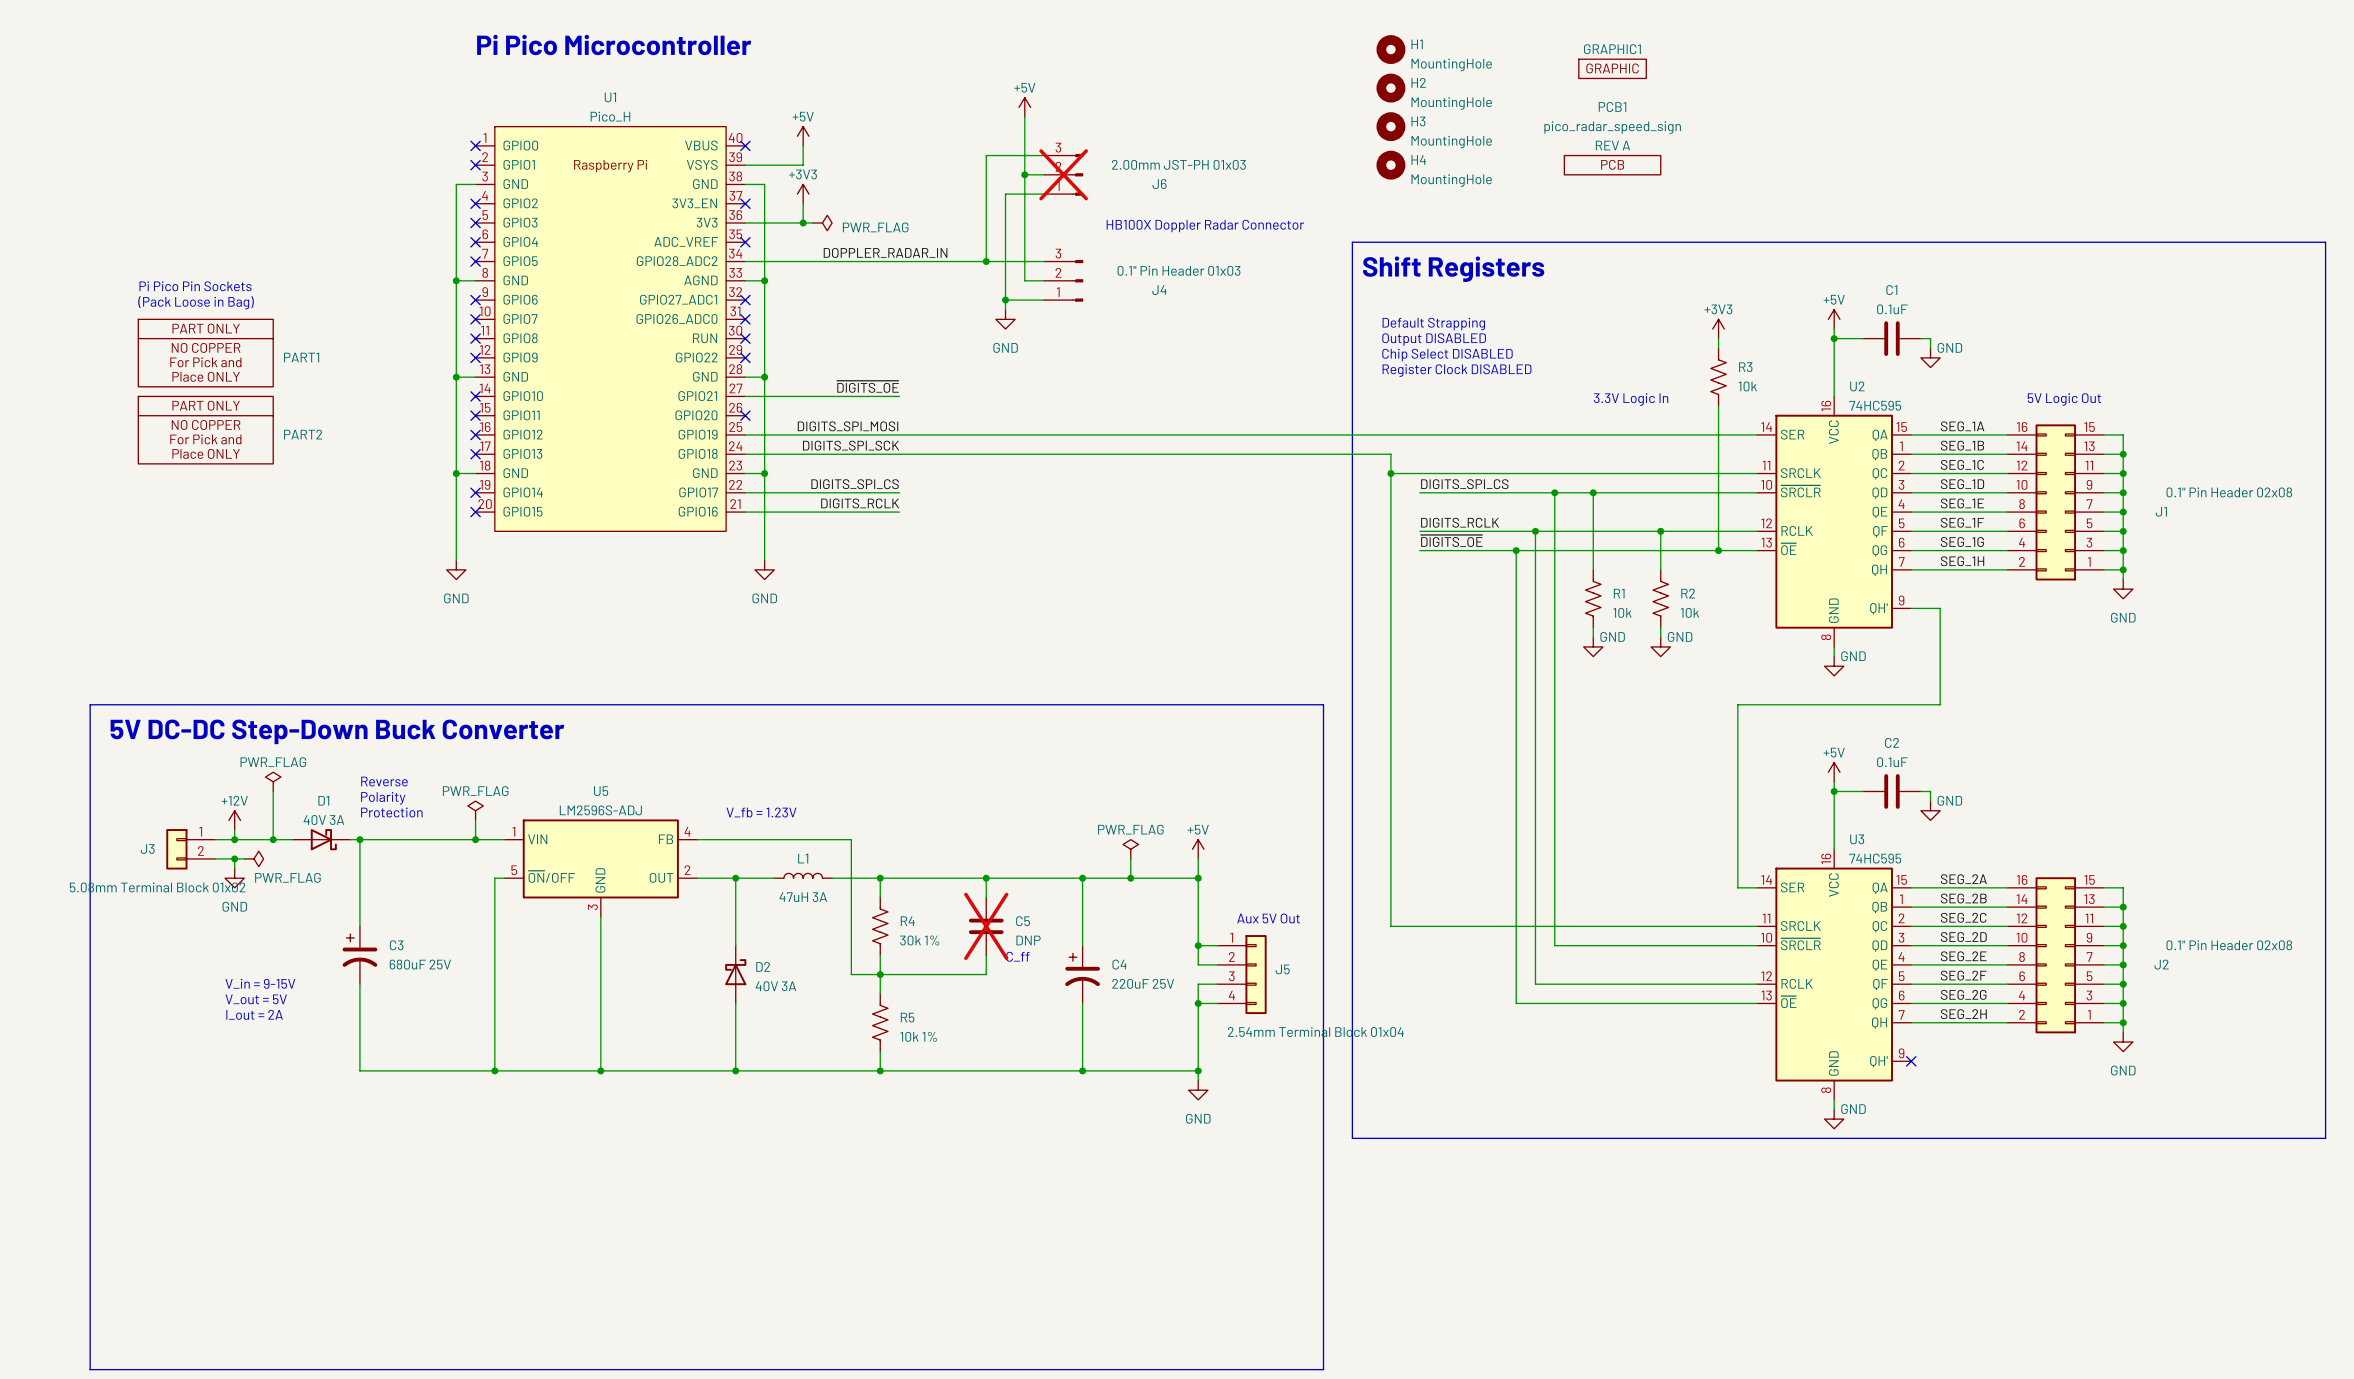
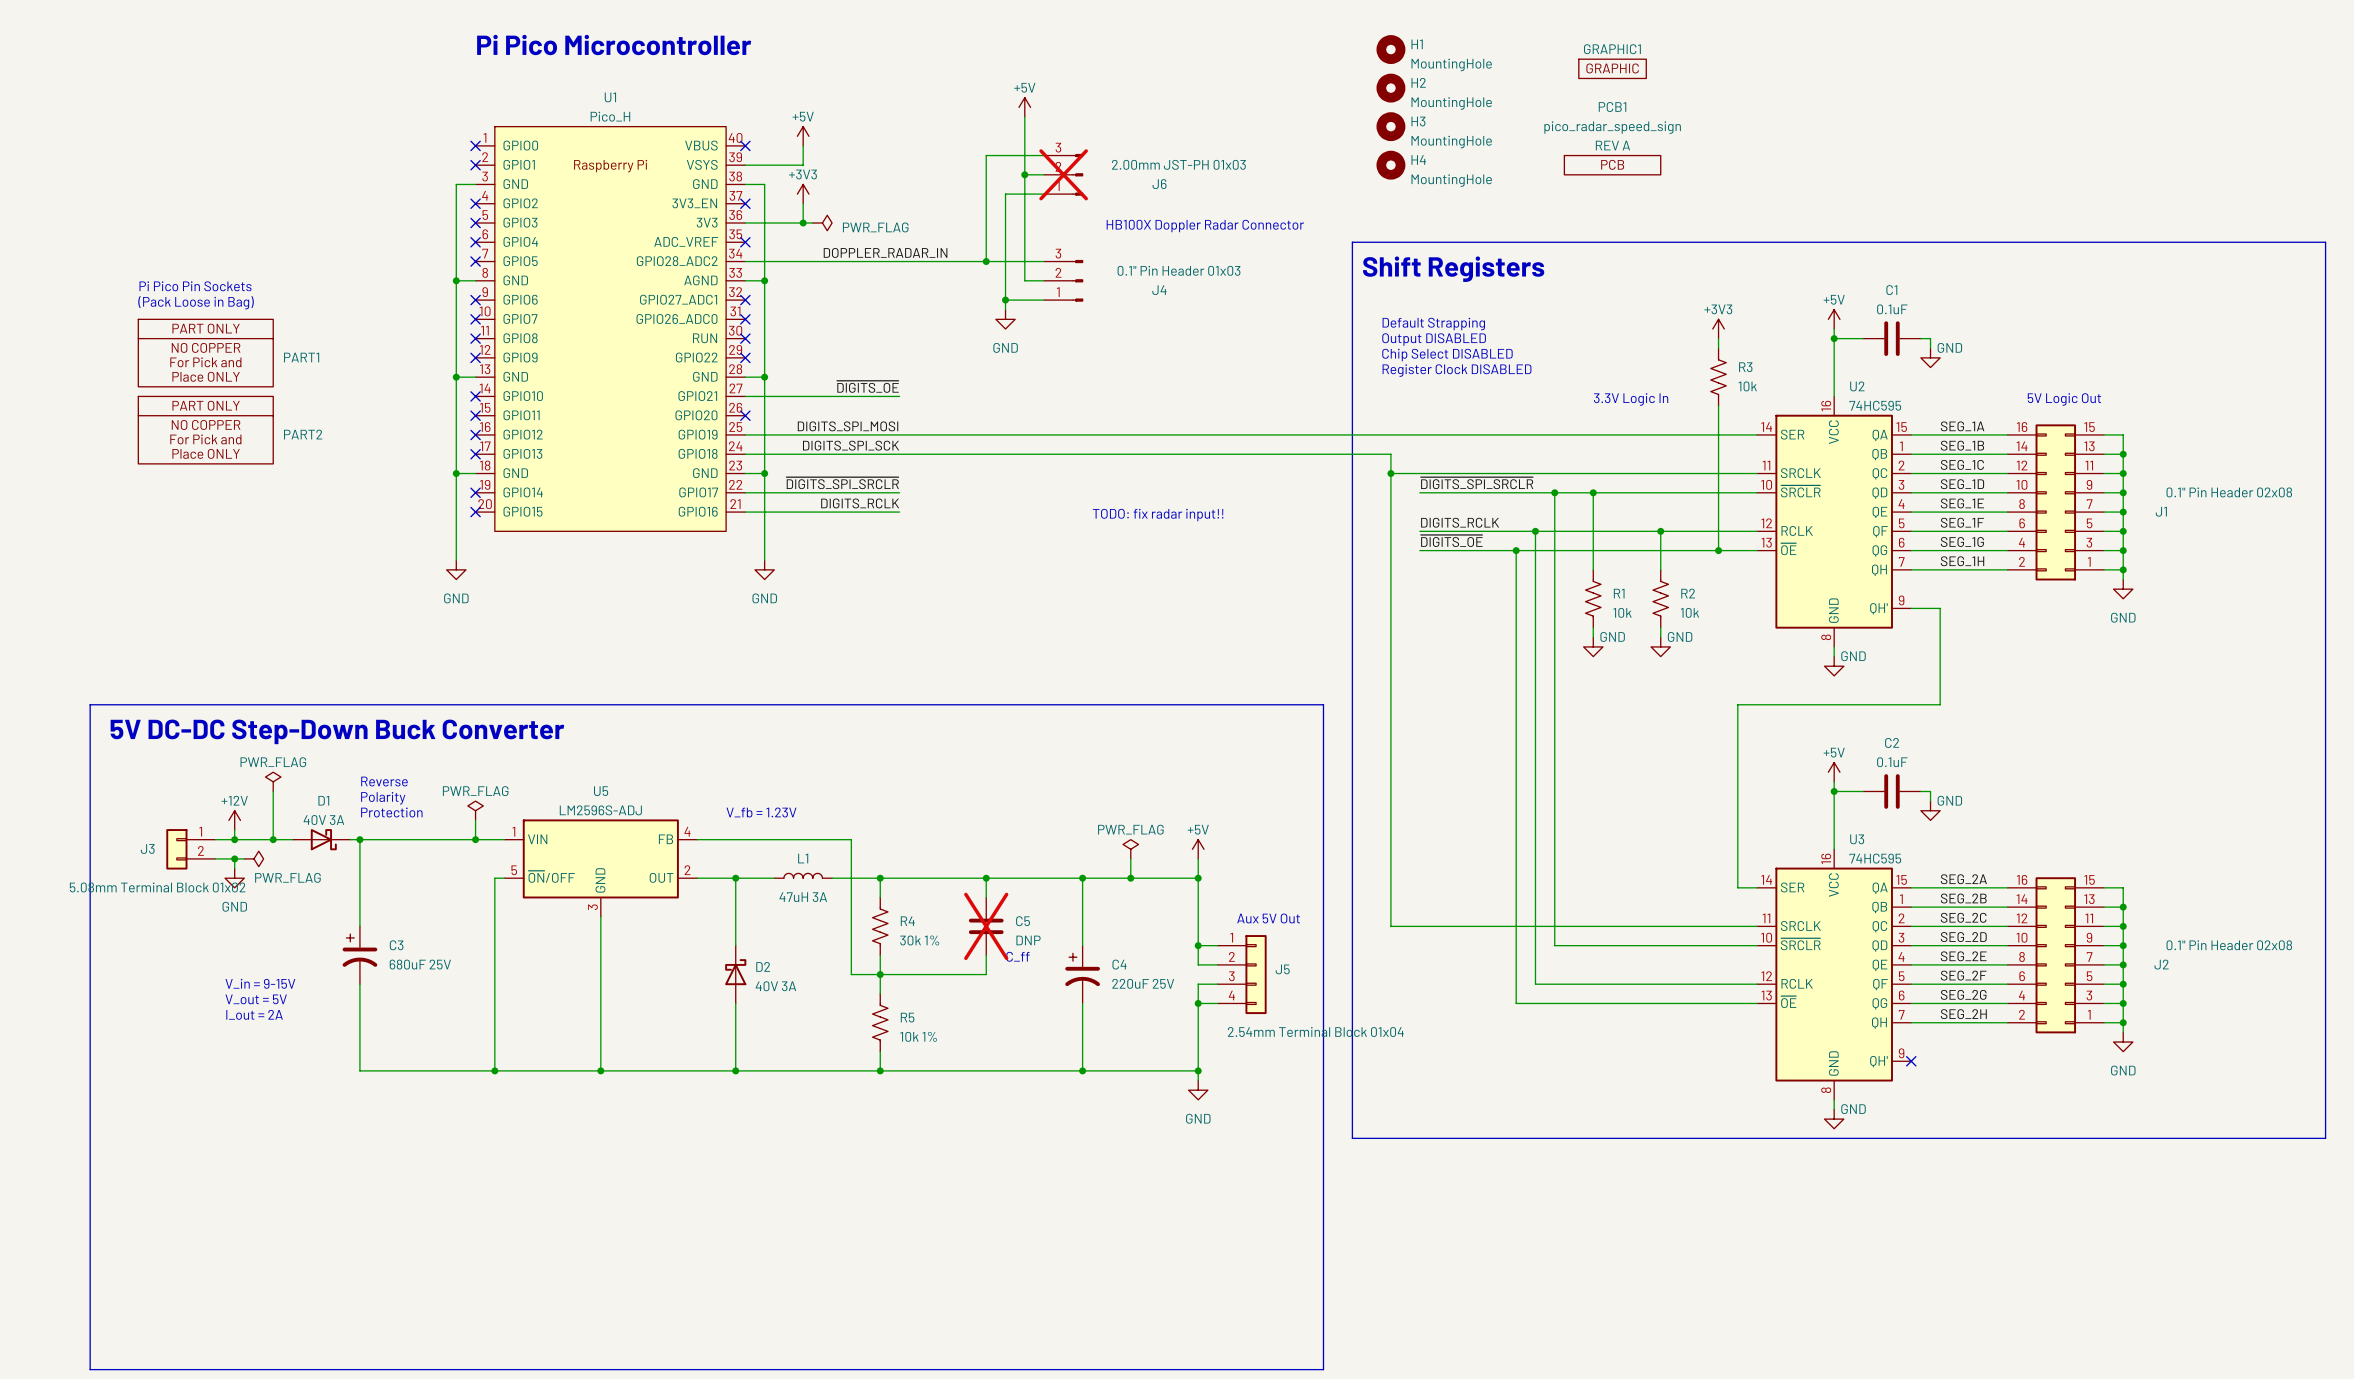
label: DIGITS_SPI_CS (855, 484) -> ~{DIGITS_SPI_SRCLR} (842, 483)
label: DIGITS_SPI_CS (1464, 484) -> ~{DIGITS_SPI_SRCLR} (1477, 483)
text: none -> TODO: fix radar input!! (1158, 515)

